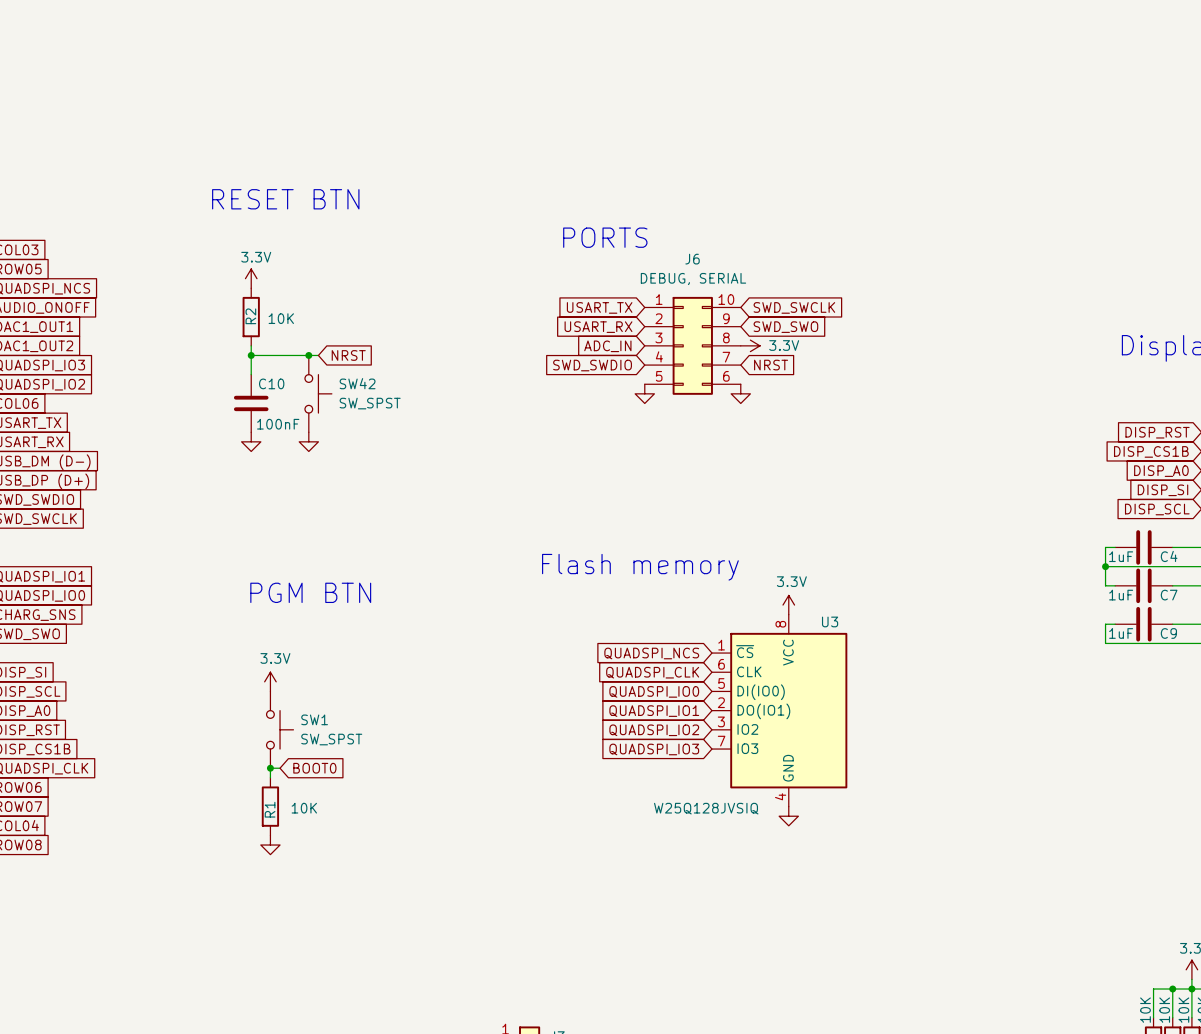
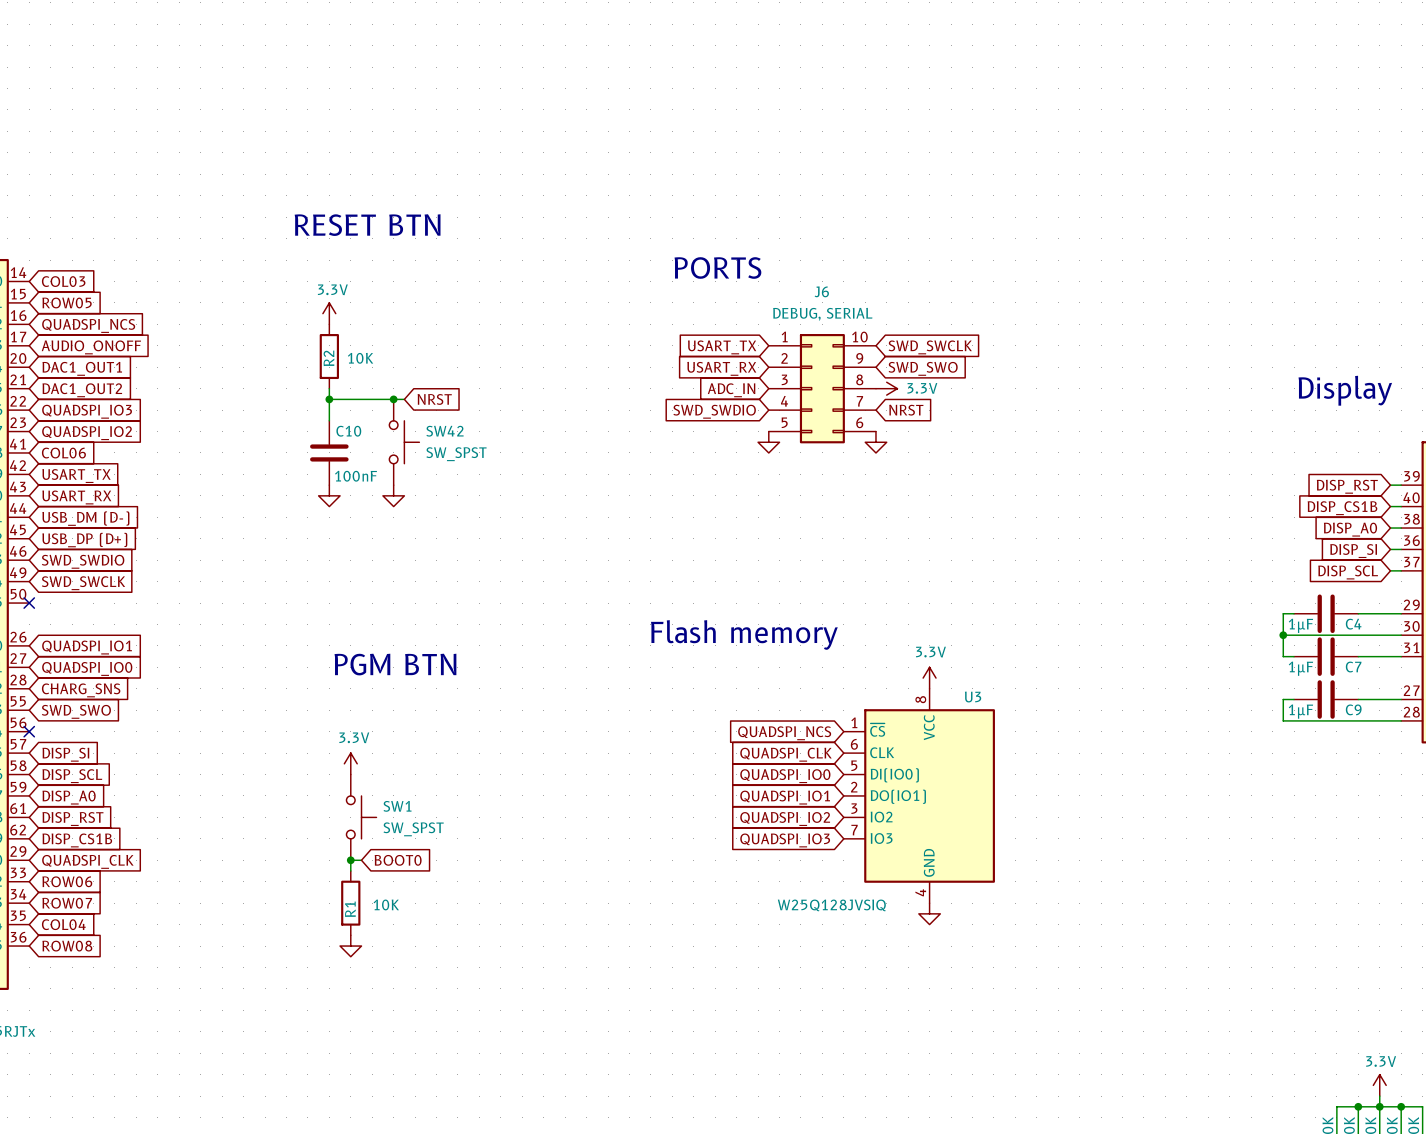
C4 value: 1uF (1121, 556) -> 1µF (1300, 625)
C7 value: 1uF (1121, 595) -> 1µF (1300, 668)
C9 value: 1uF (1121, 633) -> 1µF (1300, 711)

